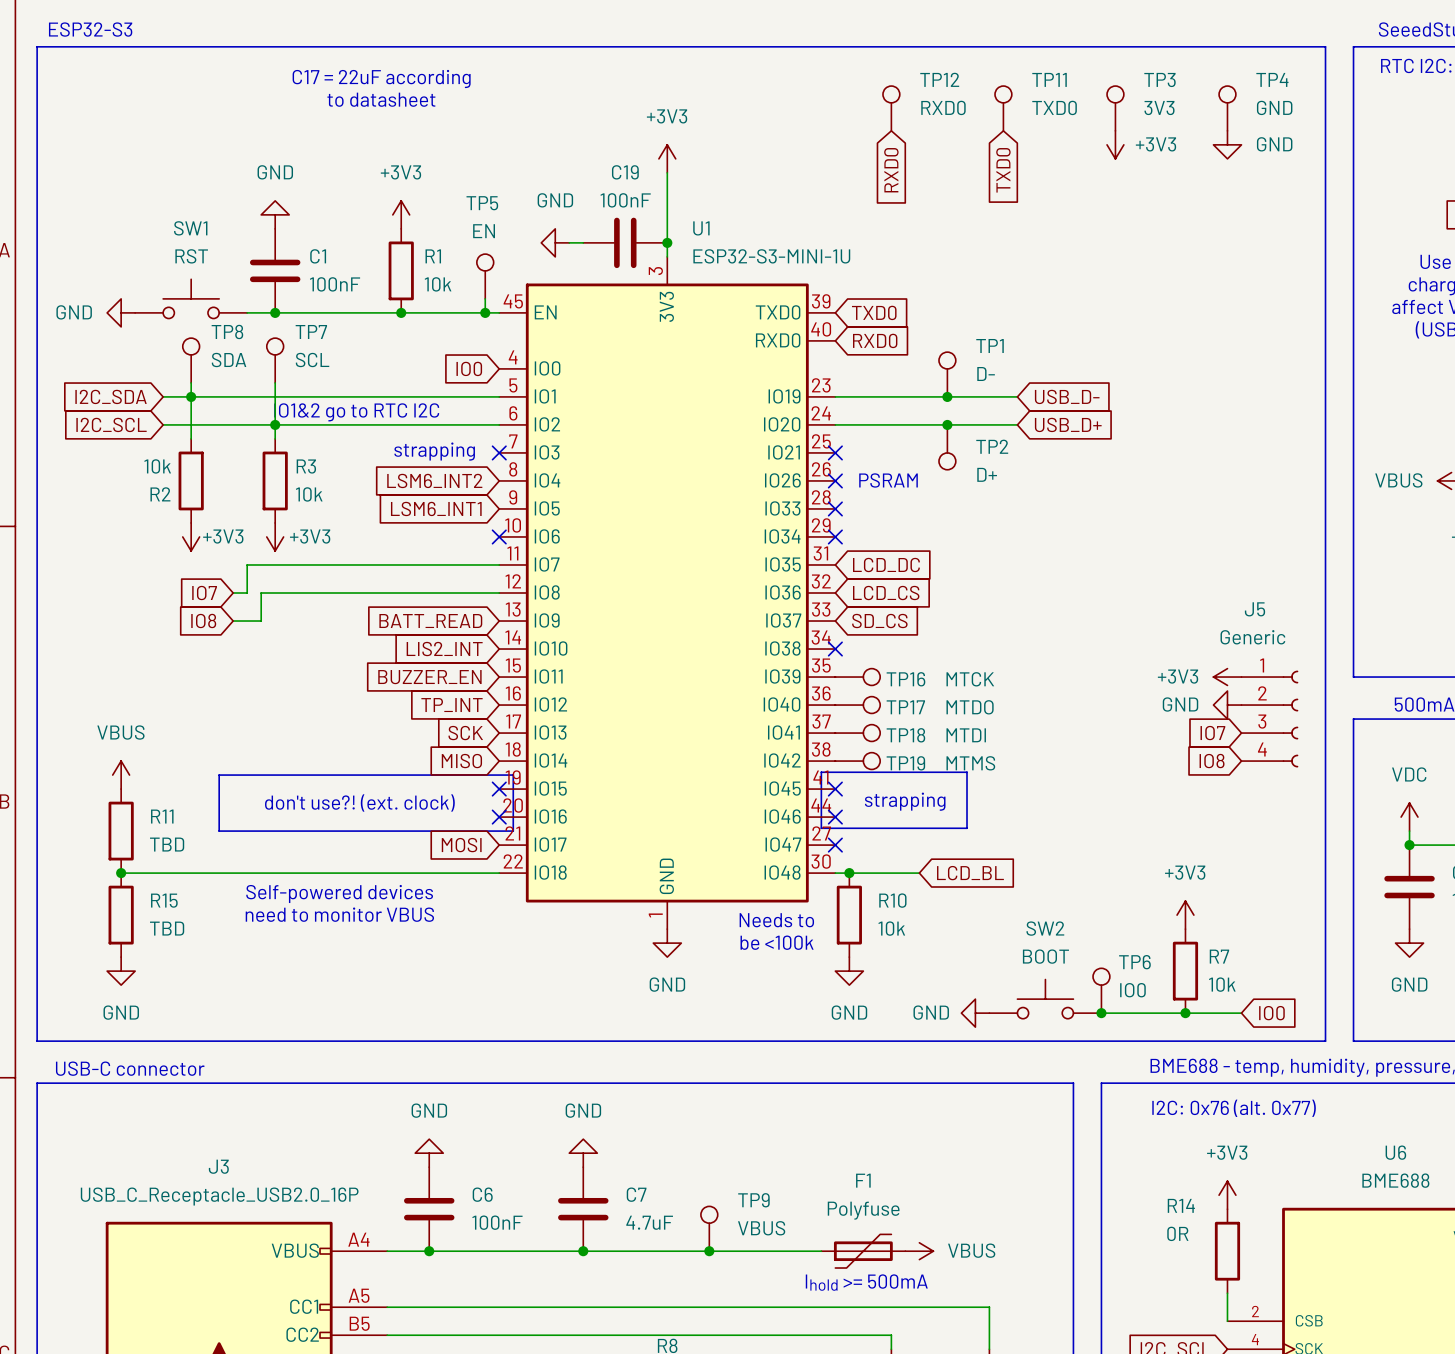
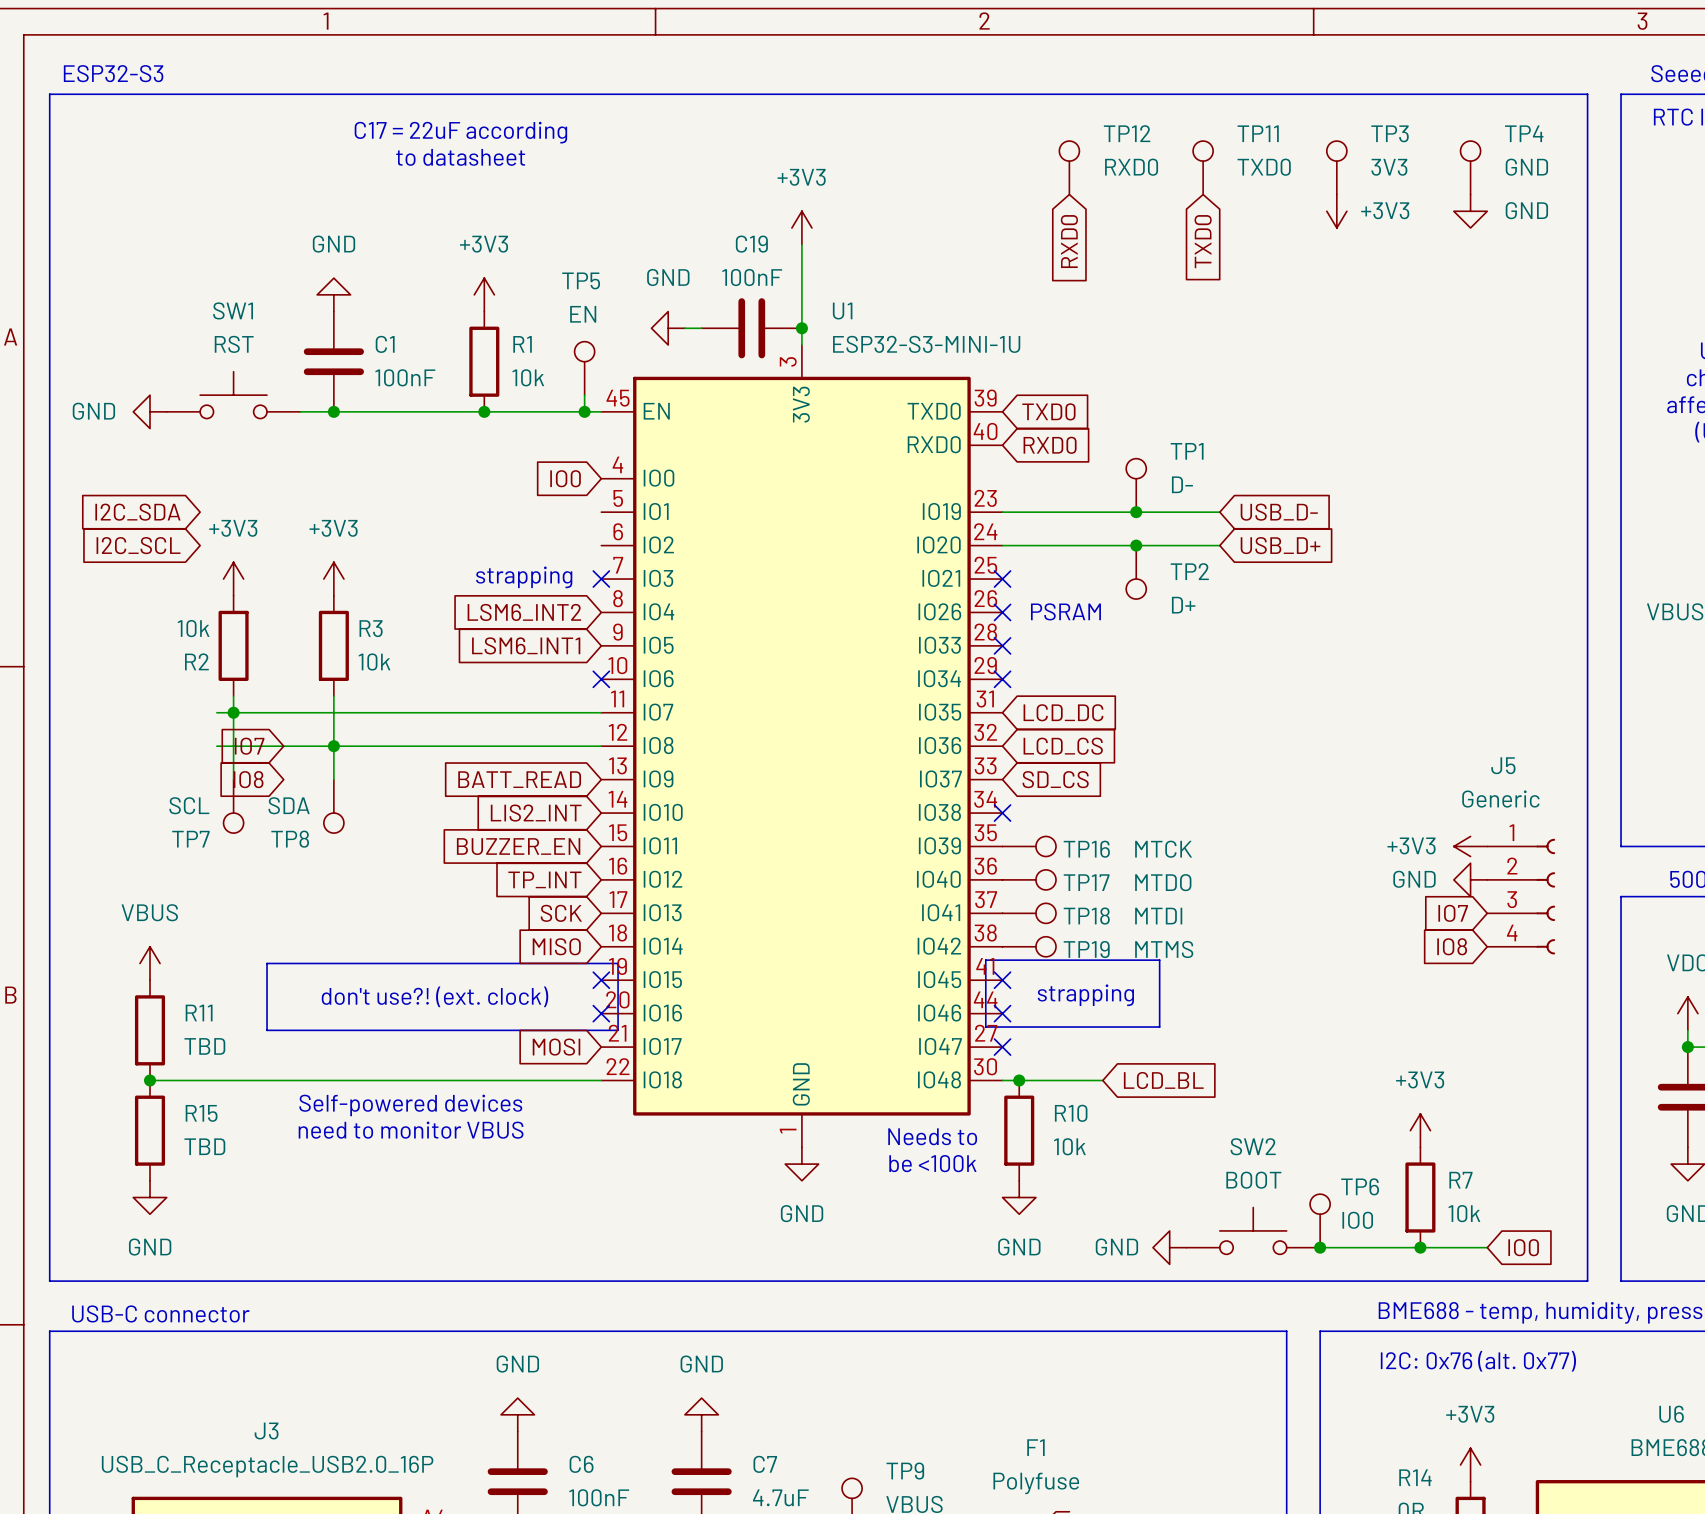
TP8 rotation: 0° (191, 346) -> 180° (333, 823)
TP7 rotation: 0° (275, 346) -> 180° (233, 823)
TP8 position: (191, 360) -> (333, 806)
TP7 position: (275, 360) -> (233, 806)
wire: (191, 382) (191, 438) -> none
wire: (275, 382) (275, 438) -> none
wire: (163, 396) (499, 396) -> none
junction: (191, 396) -> none
text: IO1&2 go to RTC I2C (356, 412) -> none
wire: (163, 424) (499, 424) -> none
junction: (275, 424) -> none
power symbol: none -> +3V3 (233, 579)
power symbol: none -> +3V3 (333, 579)
R2 position: (191, 480) -> (233, 645)
R3 position: (275, 480) -> (333, 645)
power symbol: +3V3 (191, 536) -> none
power symbol: +3V3 (275, 536) -> none
wire: none -> (233, 696) (233, 779)
wire: none -> (333, 696) (333, 779)
junction: none -> (233, 712)
wire: (247, 564) (247, 593) -> (300, 712) (216, 712)
wire: none -> (216, 746) (283, 746)
wire: (261, 593) (261, 621) (233, 621) -> (317, 746) (300, 746)
junction: none -> (333, 746)

